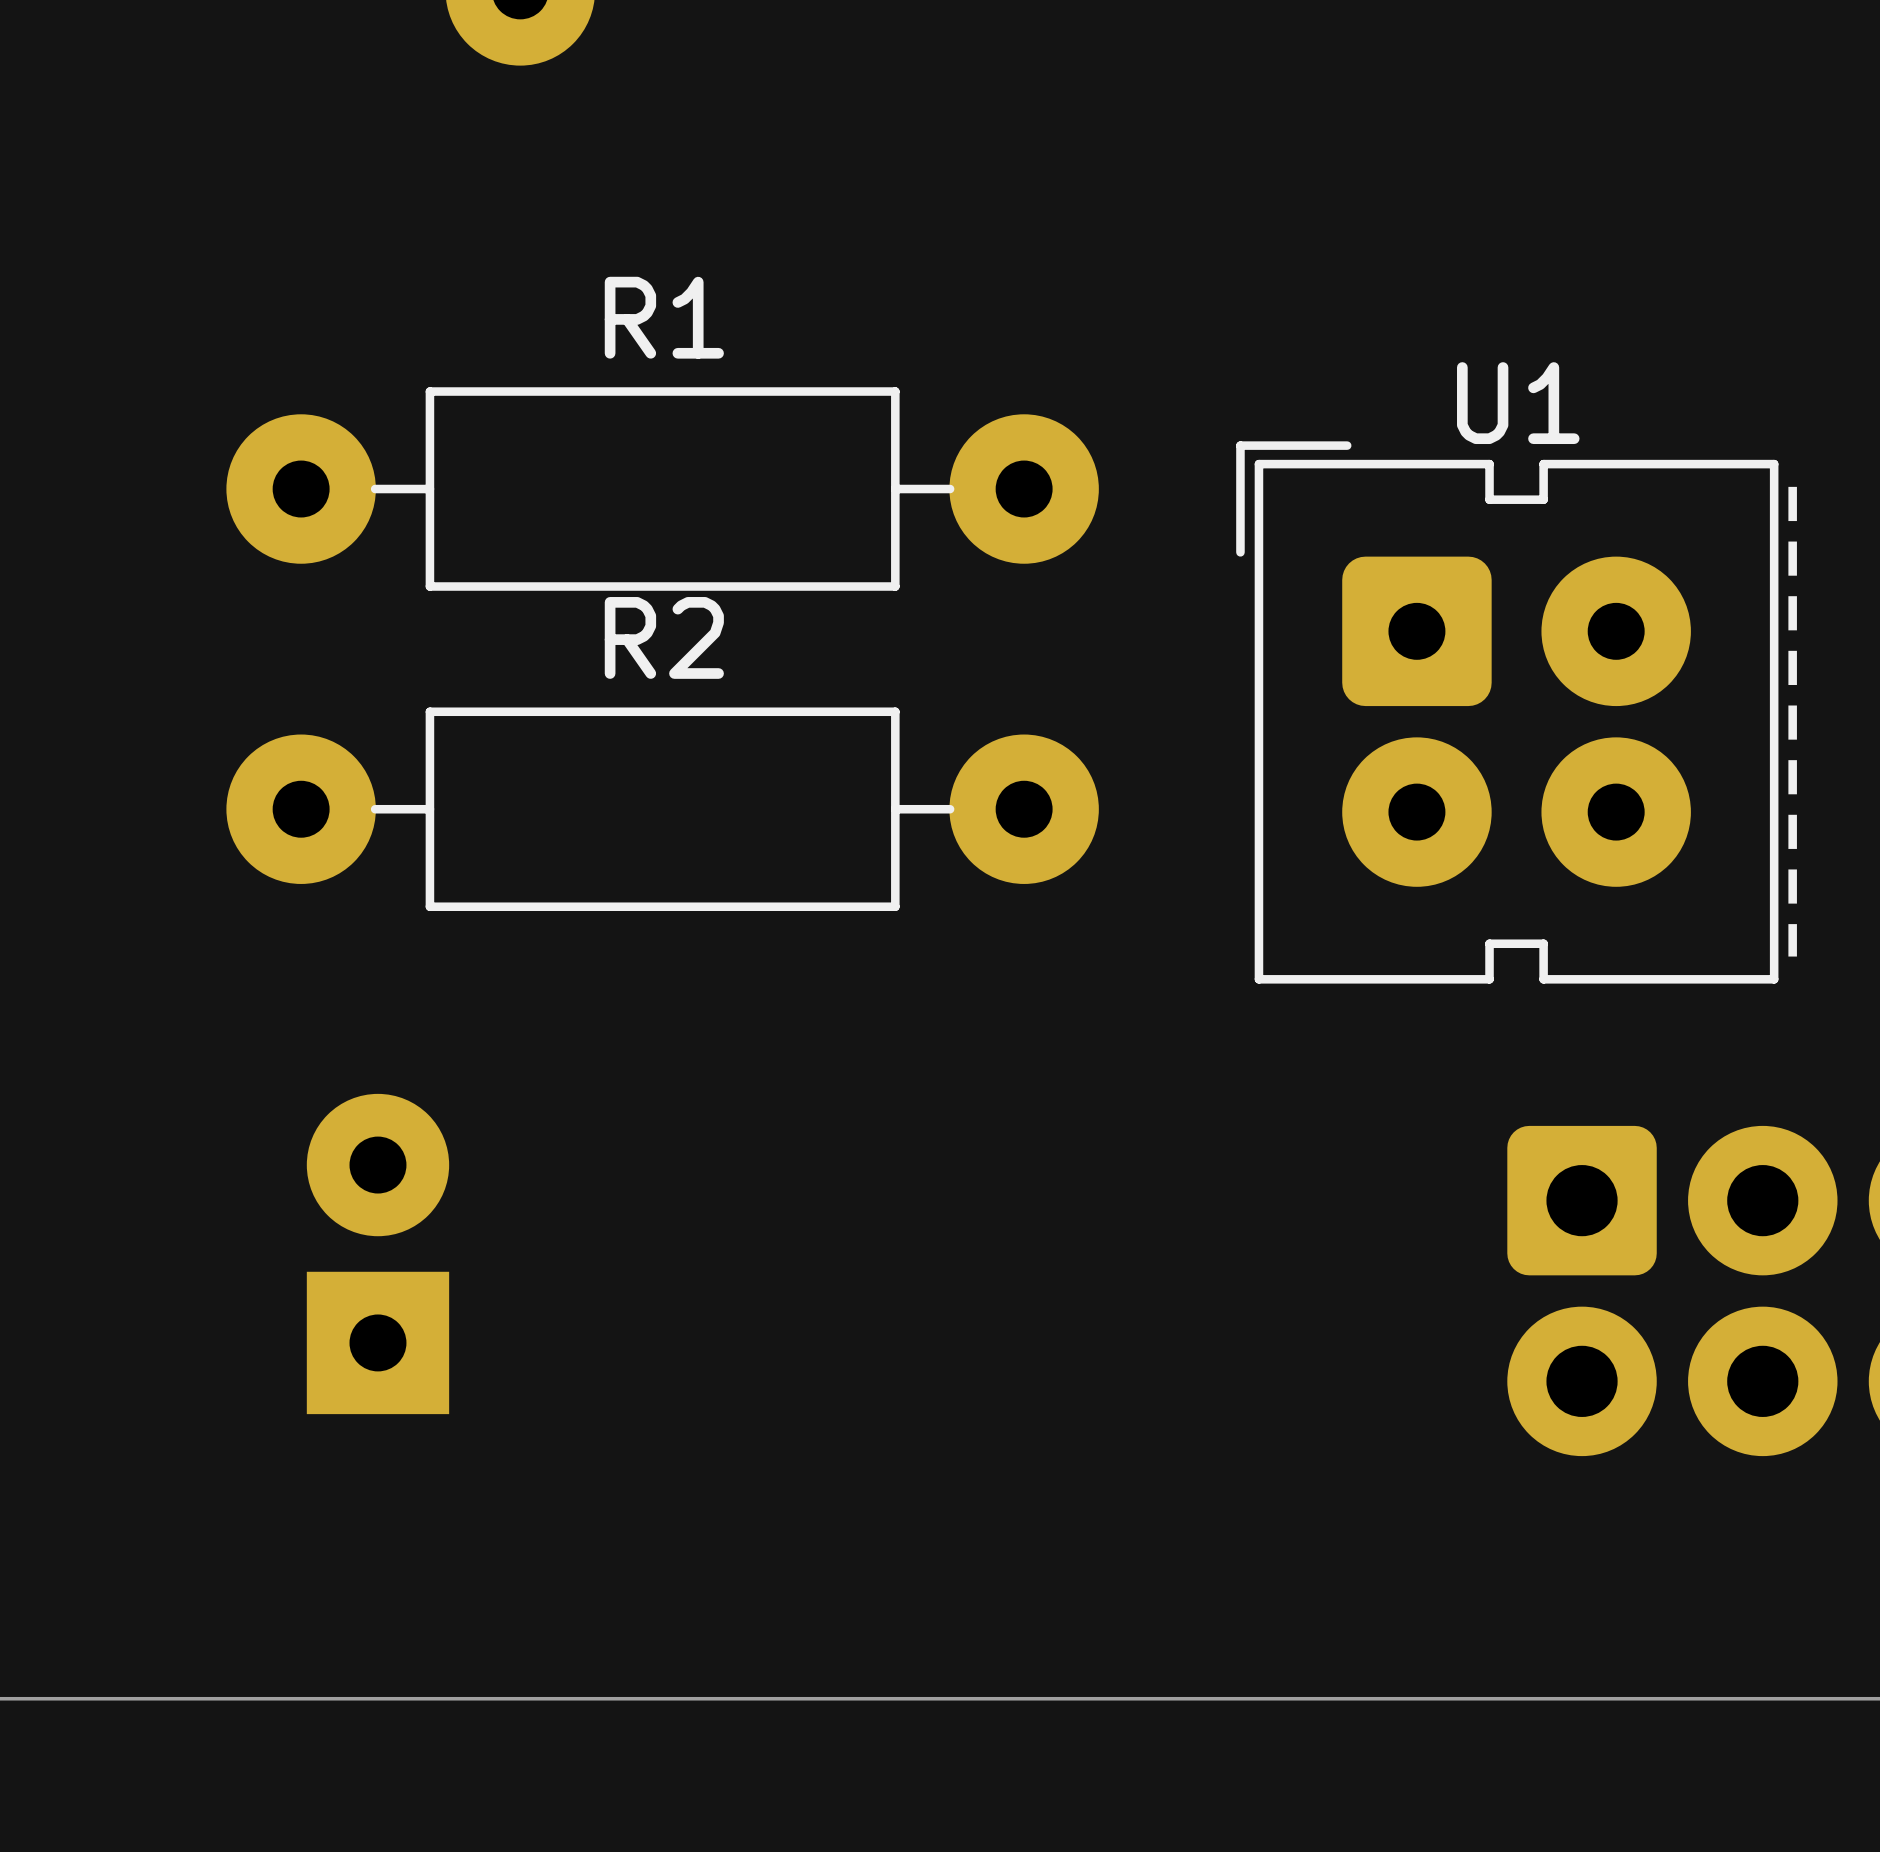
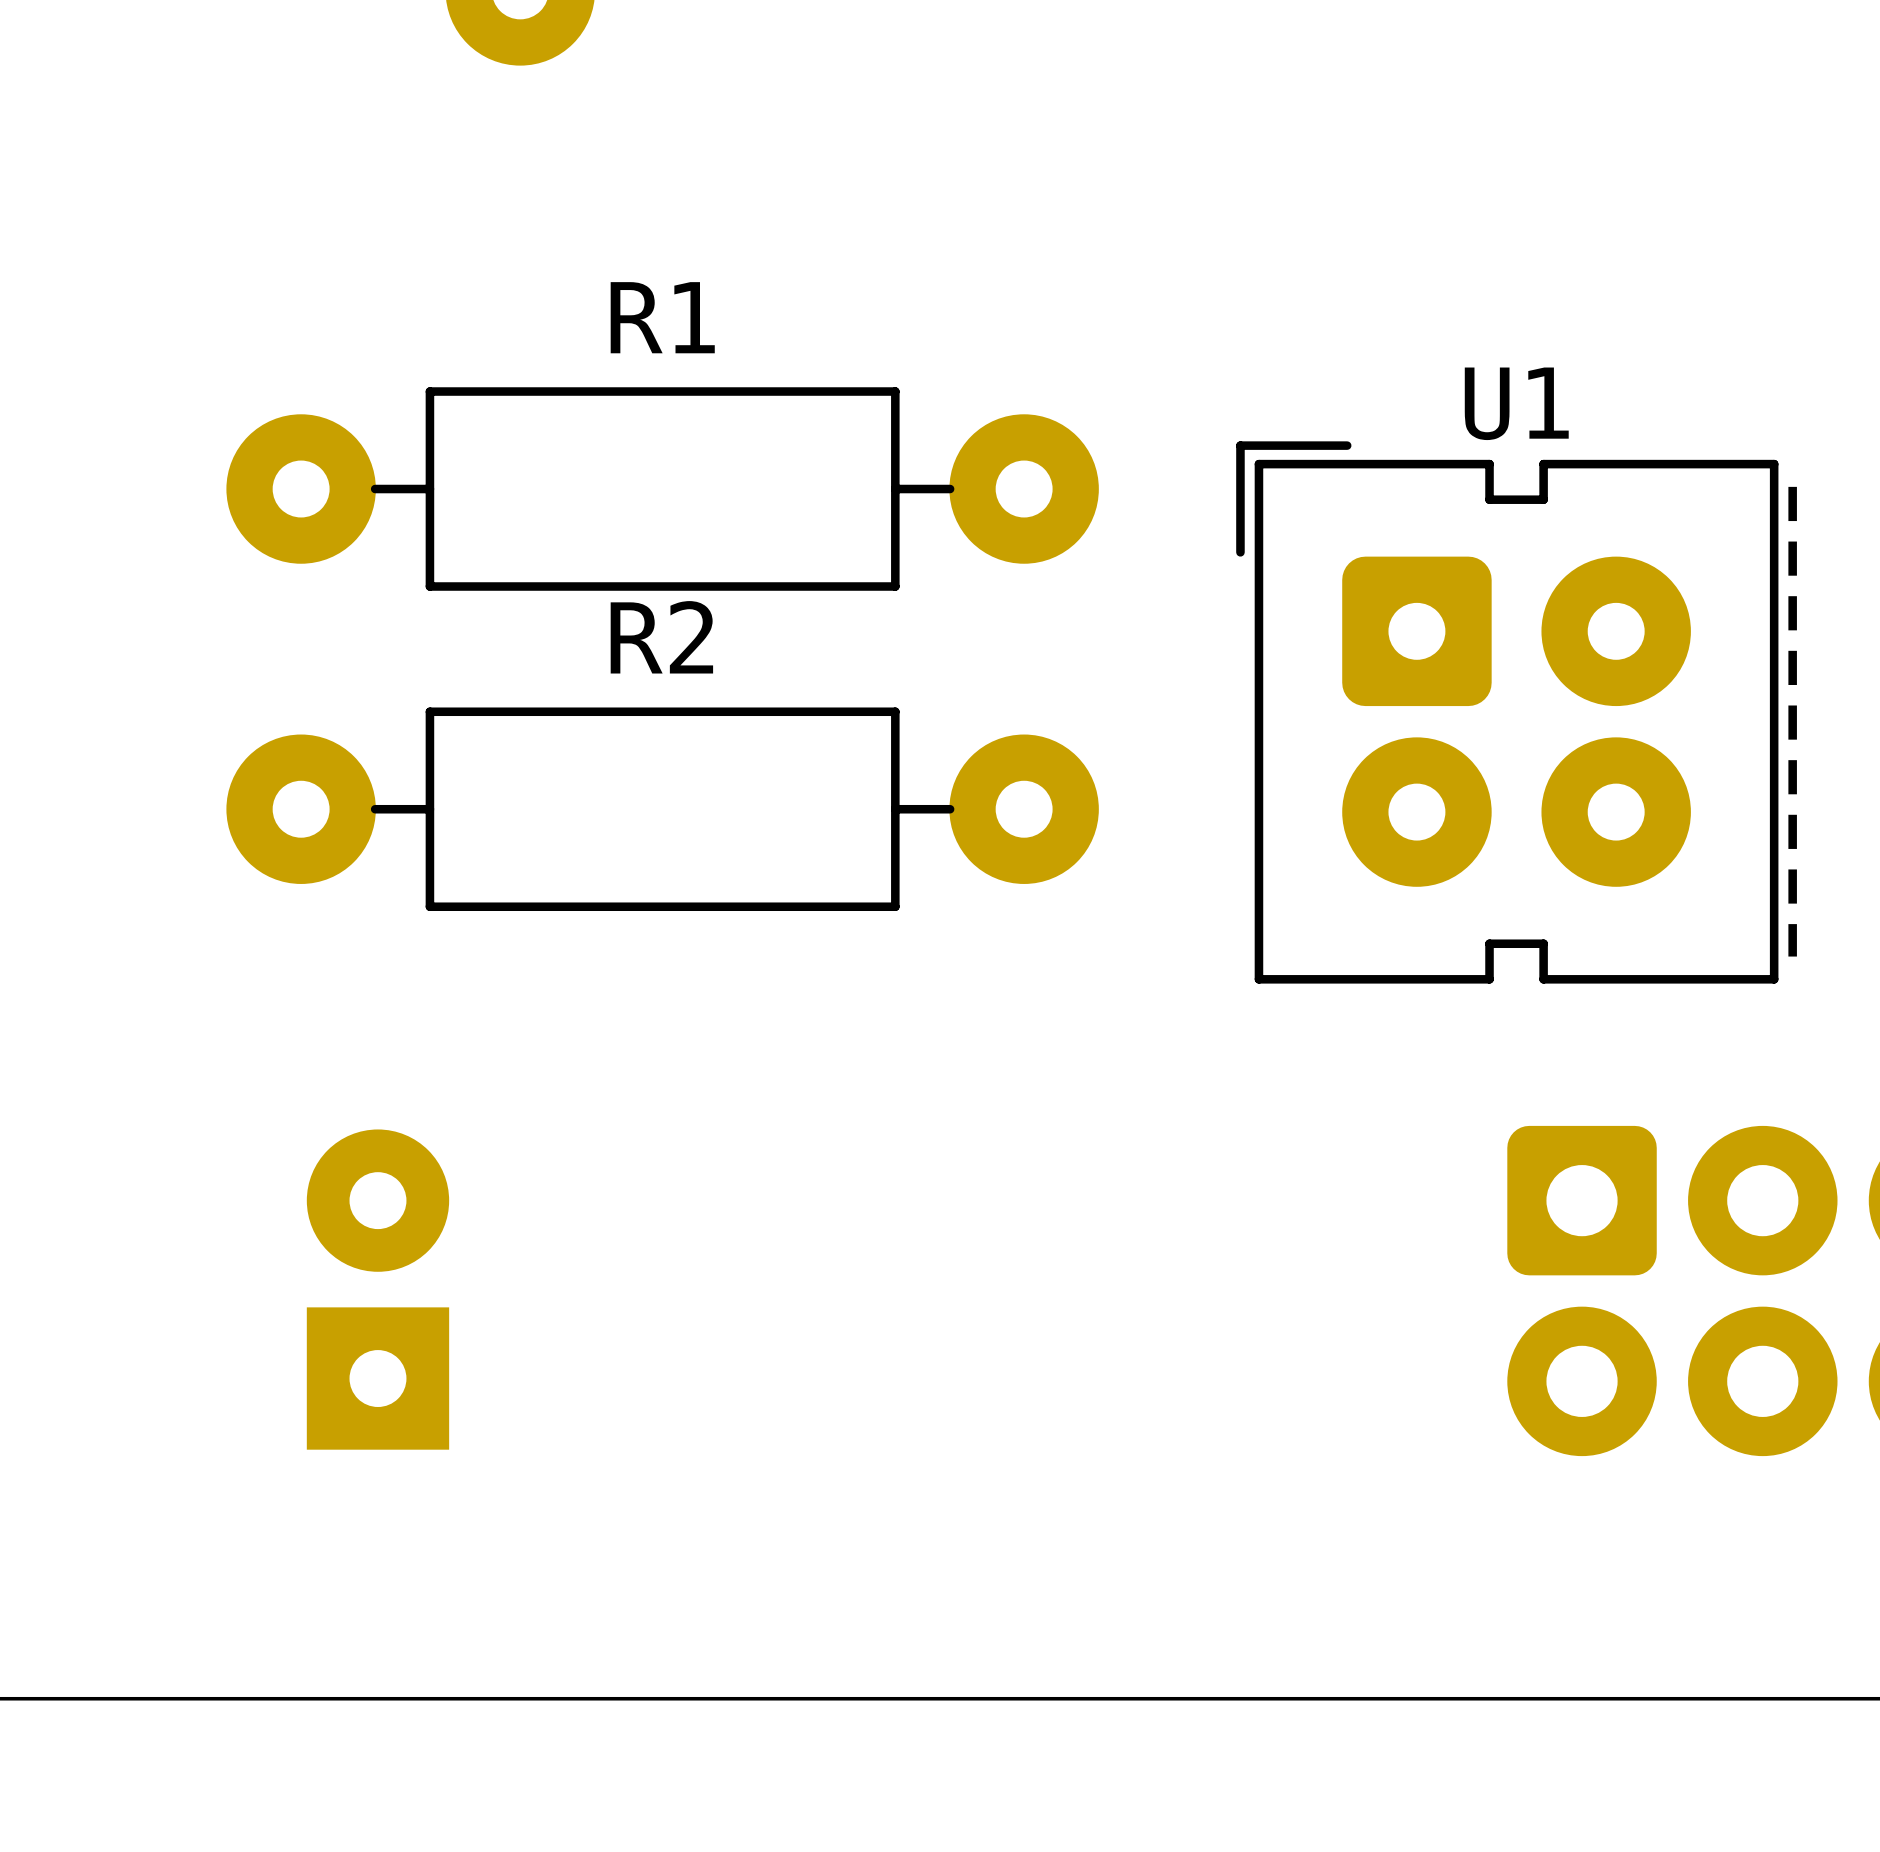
part position: (377, 1254) -> (377, 1289)

